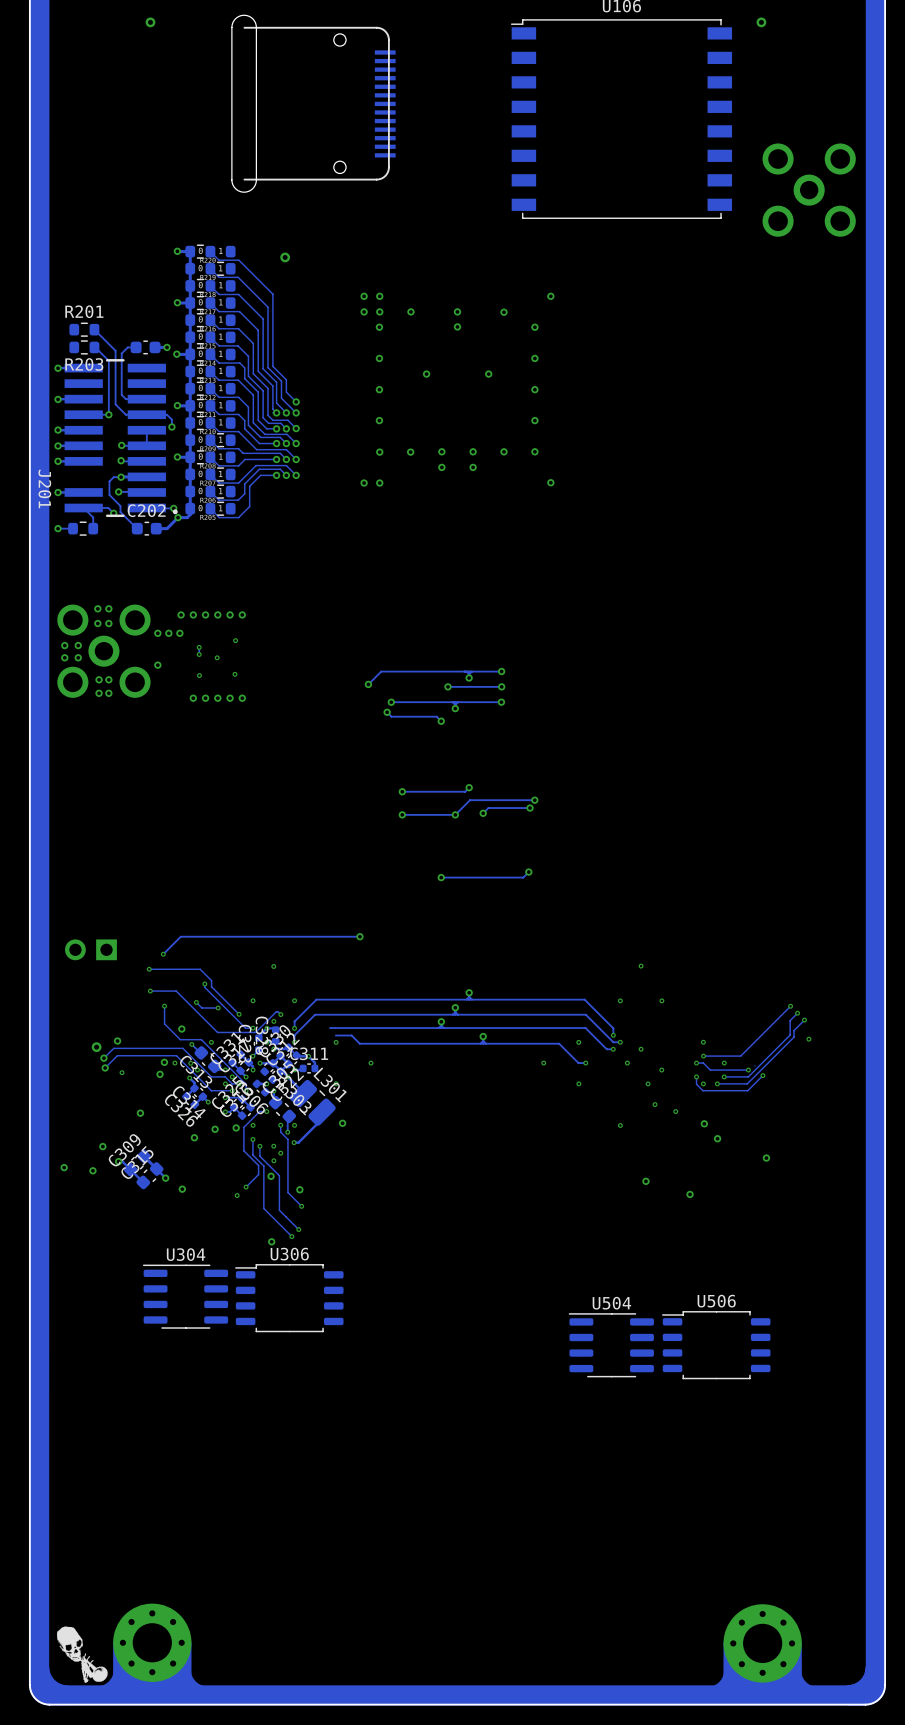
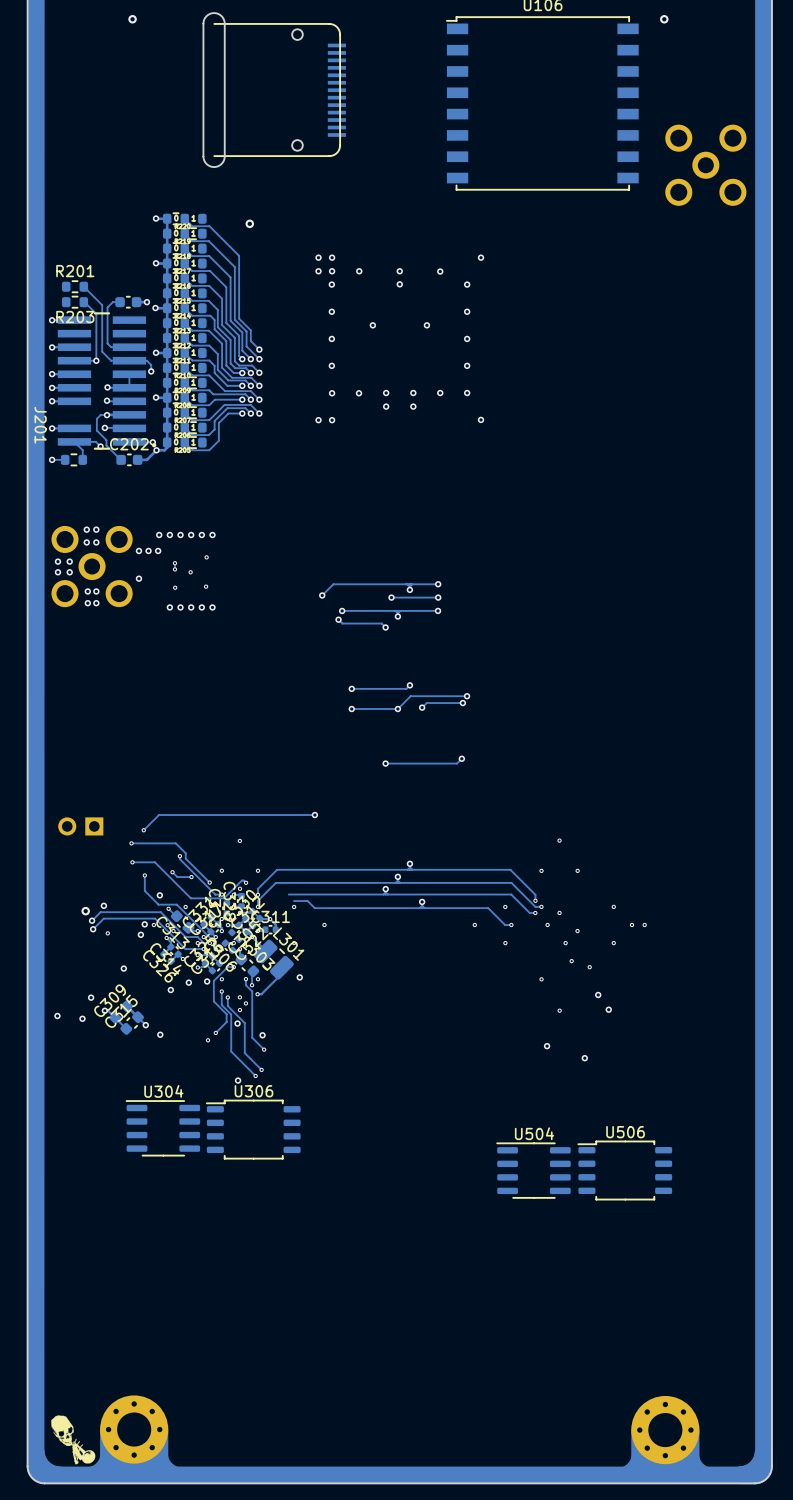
track: (790, 1006) (740, 1056) (703, 1056) -> none
via: (790, 1006) -> none
track: (797, 1013) (790, 1020) (790, 1035) (748, 1076) (724, 1076) -> none
via: (797, 1013) -> none
track: (804, 1020) (793, 1030) (793, 1037) (747, 1083) (717, 1083) -> none
via: (804, 1020) -> none
via: (808, 1039) -> none
via: (703, 1056) -> none
track: (696, 1063) (703, 1063) (710, 1070) (748, 1070) -> none
via: (696, 1063) -> none
via: none -> (644, 924)
via: (748, 1070) -> none
track: (762, 1075) (747, 1090) (703, 1090) (696, 1084) (696, 1076) -> none
via: (762, 1075) -> none
via: (696, 1076) -> none
via: (724, 1076) -> none
via: (717, 1083) -> none
via: (704, 1123) -> none
via: (717, 1138) -> none
via: none -> (598, 995)
via: (766, 1158) -> none
via: none -> (608, 1009)
via: none -> (559, 1010)
via: (645, 1181) -> none
via: (690, 1194) -> none
via: none -> (547, 1046)
via: none -> (584, 1058)

